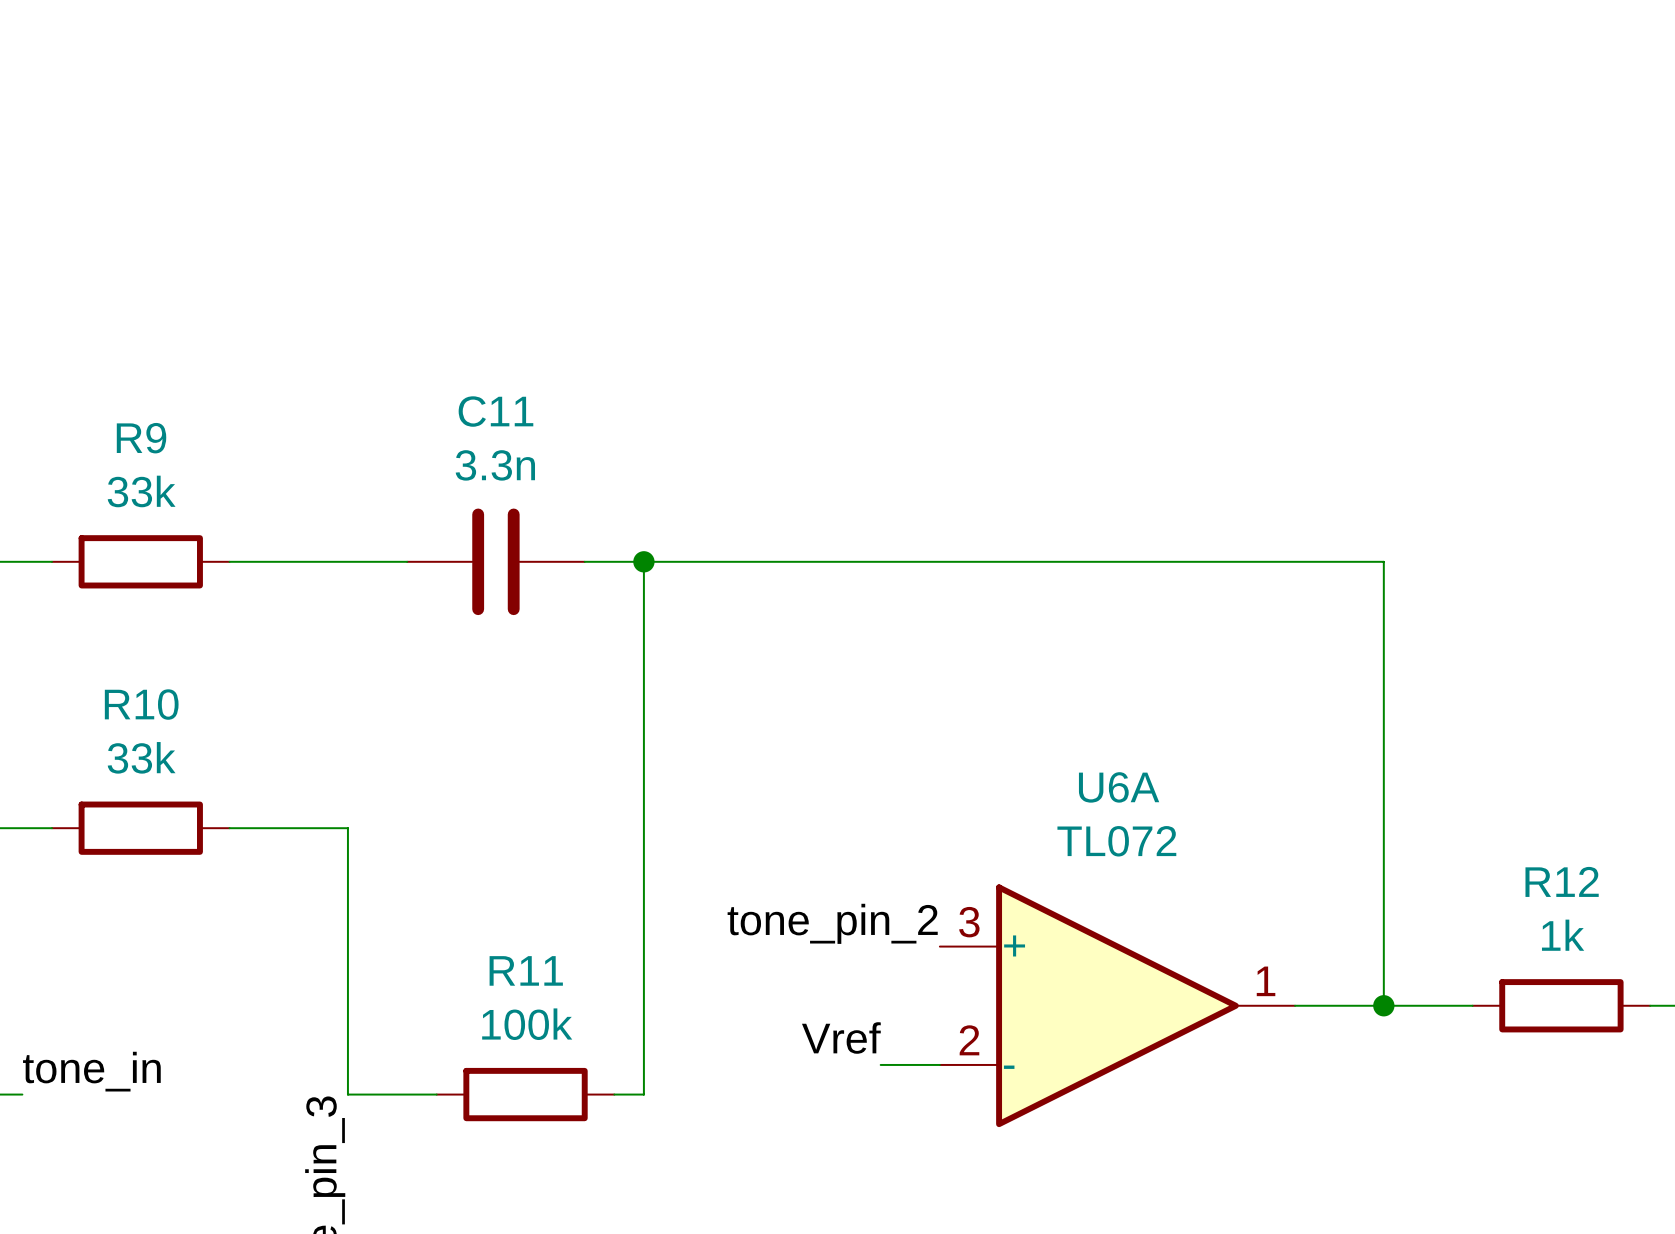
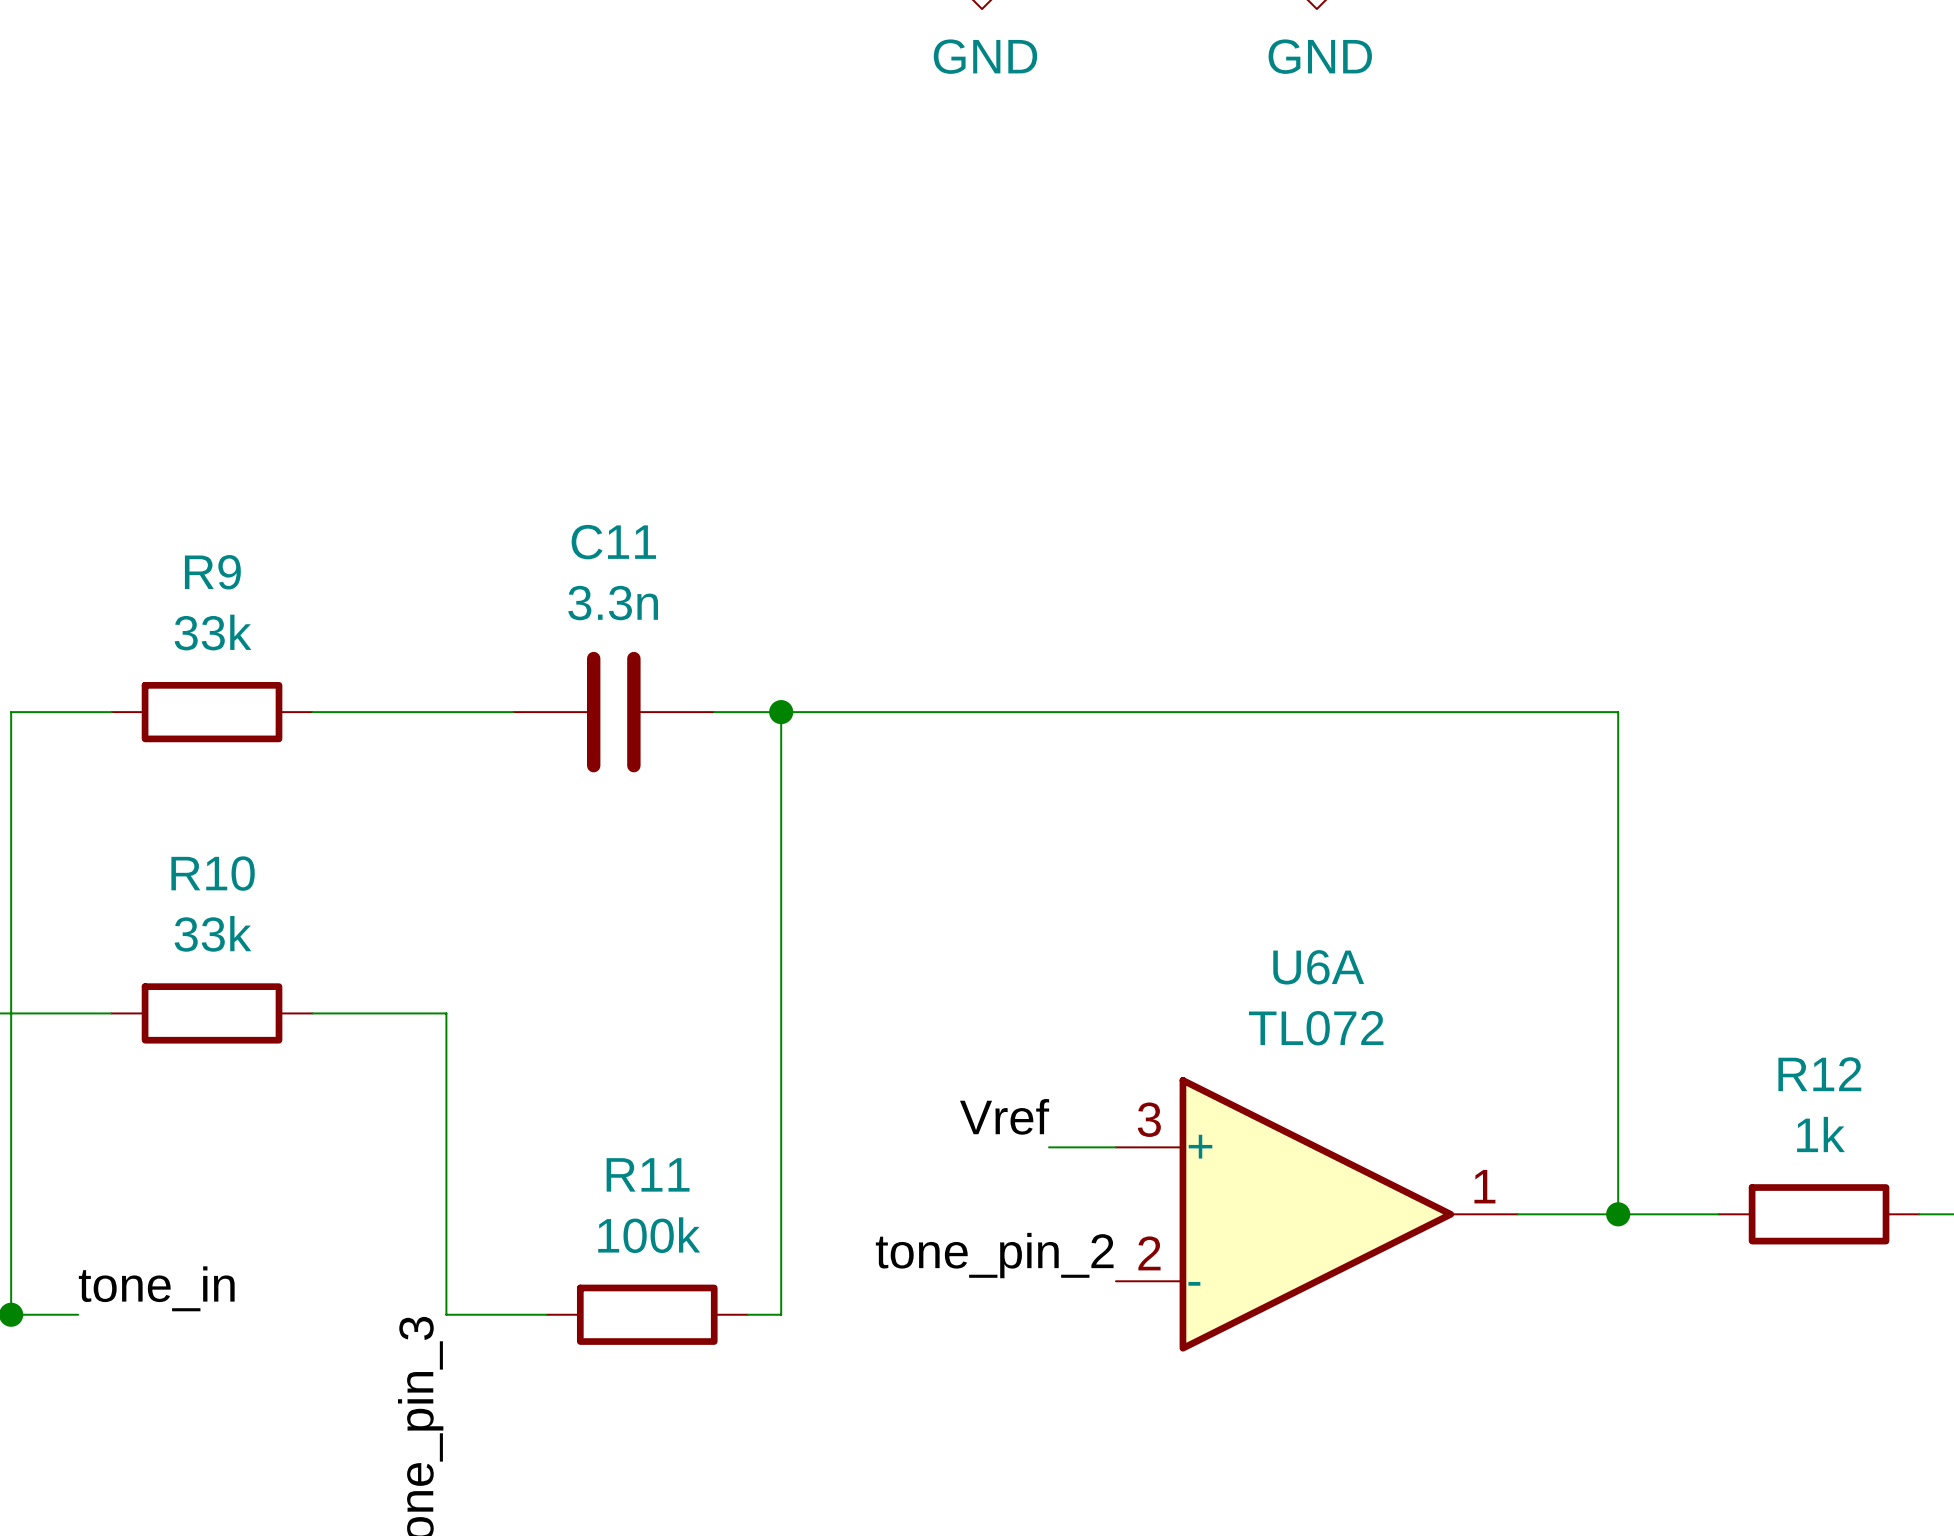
label position: tone_pin_2 (832, 923) -> tone_pin_2 (994, 1255)
label position: Vref (841, 1037) -> Vref (1004, 1116)
wire: (880, 1064) (939, 1064) -> (1049, 1147) (1115, 1147)

